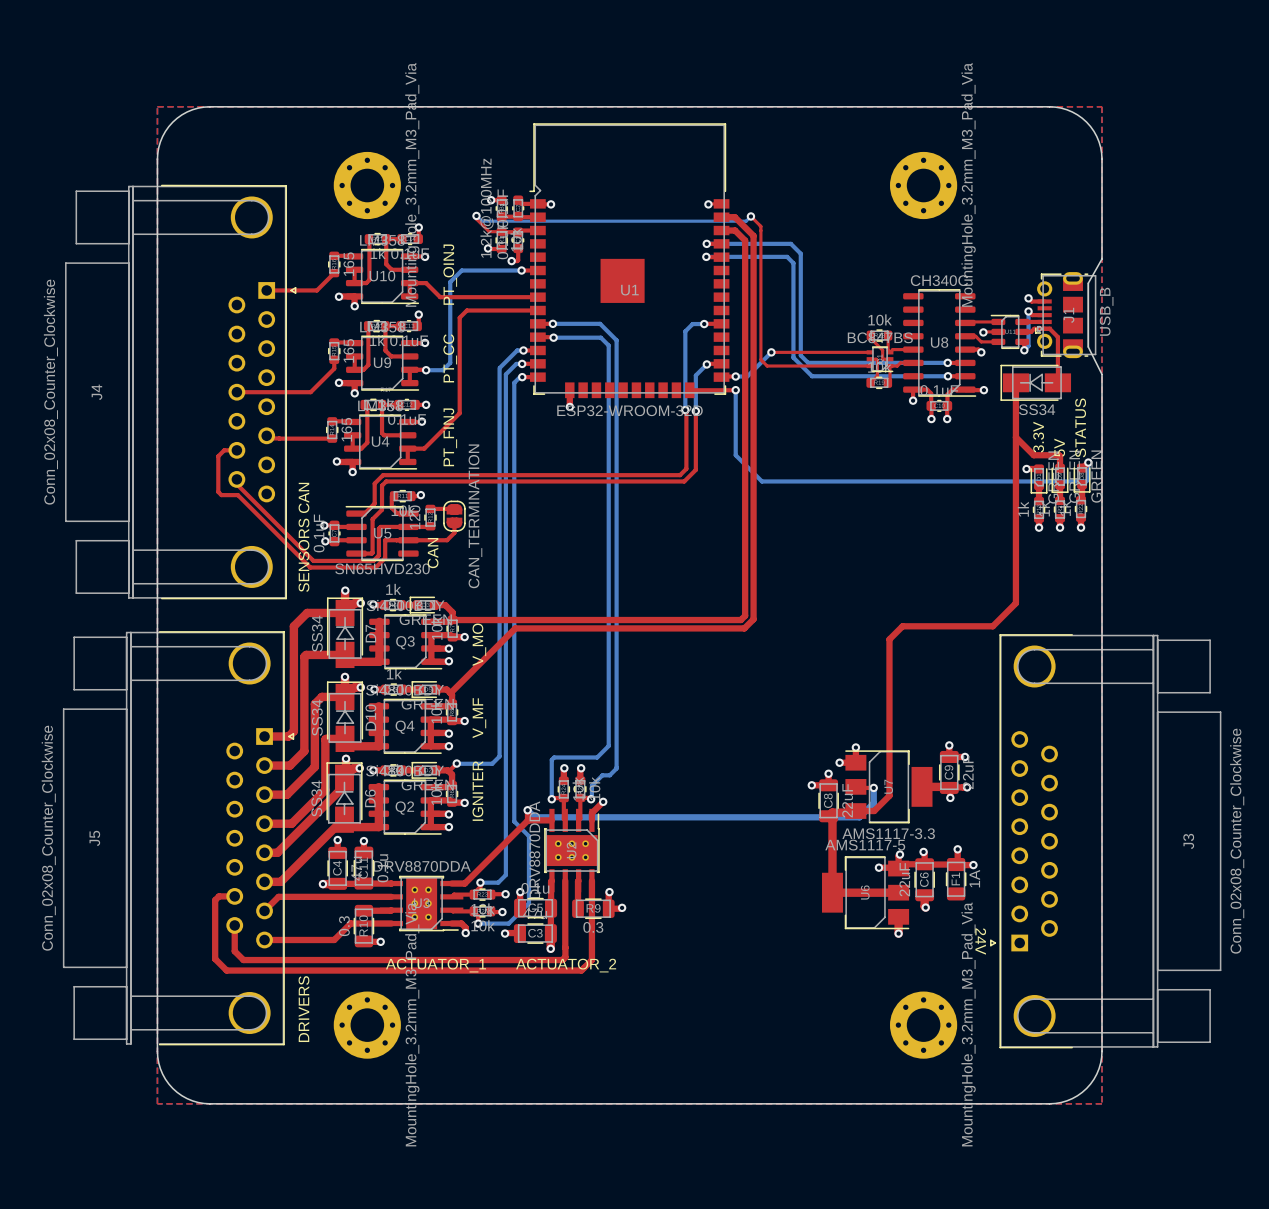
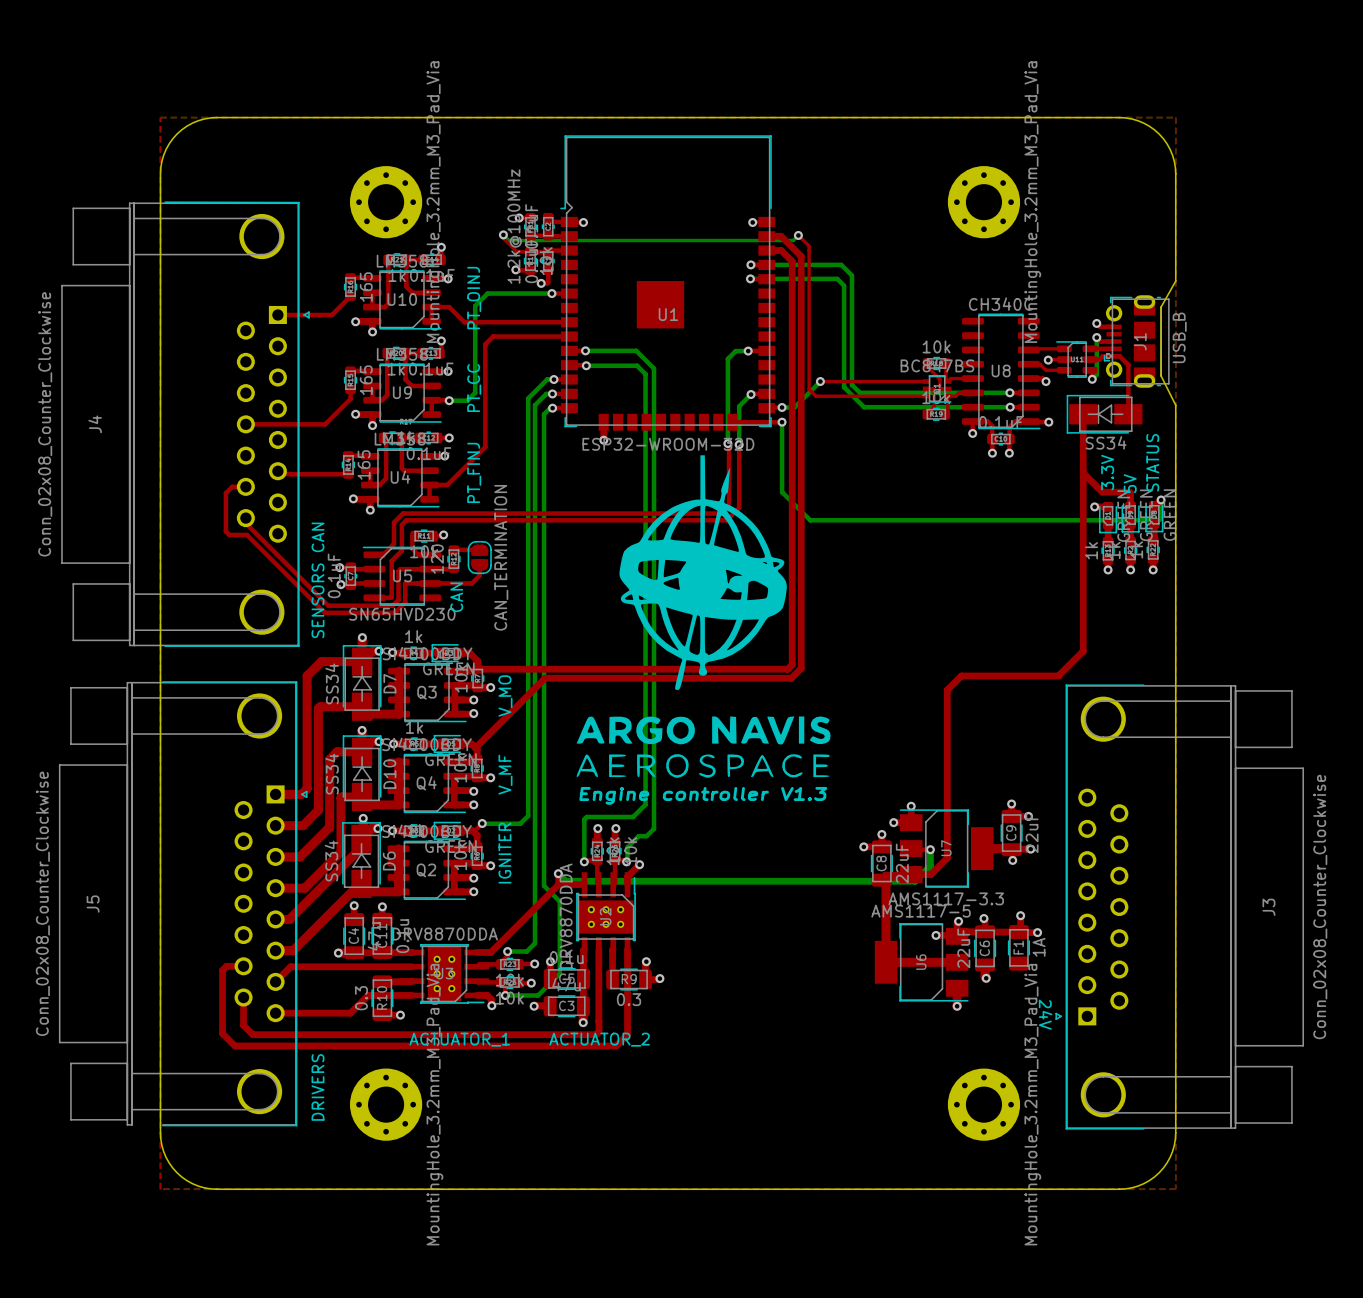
drawing: none -> [576, 455, 831, 778]
text: none -> V1.3 (804, 794)
text: none -> Engine controller (674, 795)

